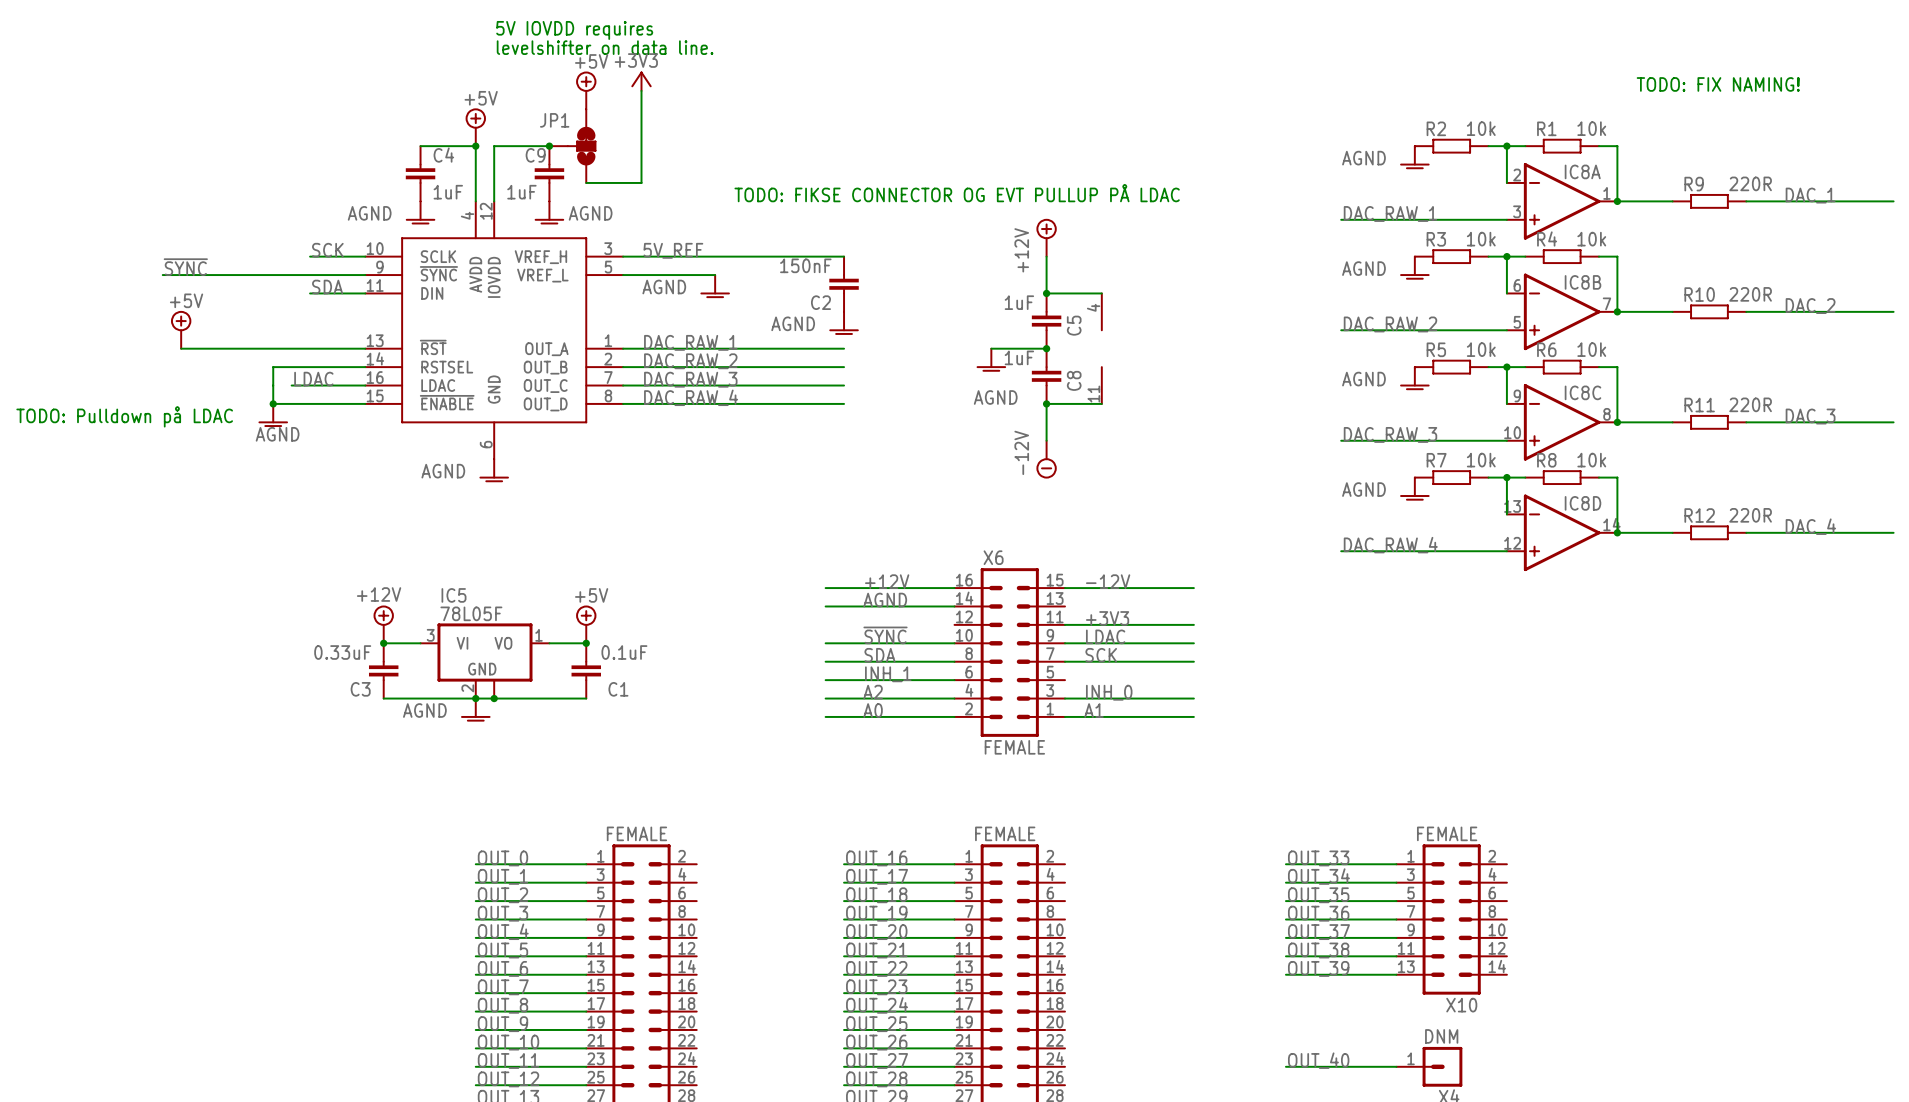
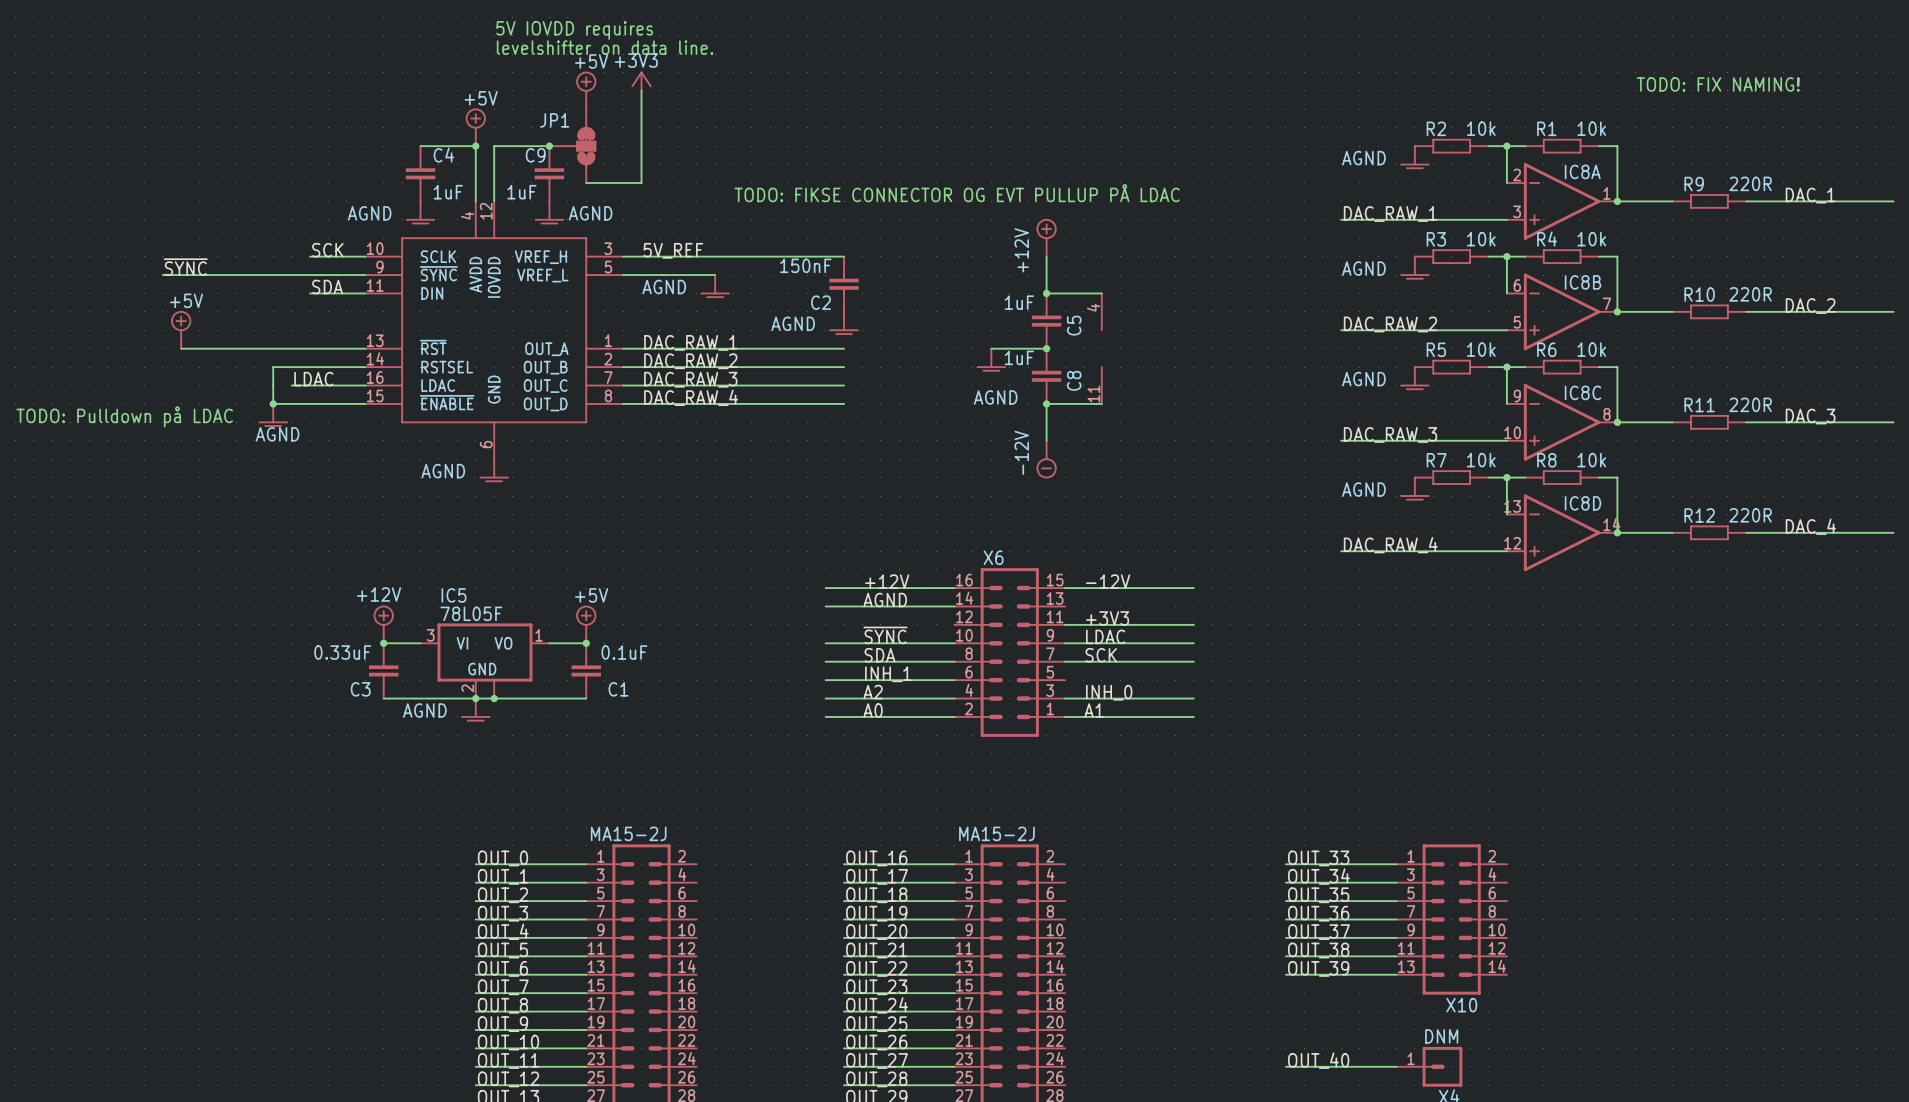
X6 value: FEMALE (1014, 747) -> none
part value: FEMALE (636, 833) -> MA15-2J (628, 833)
part value: FEMALE (1005, 833) -> MA15-2J (996, 833)
X10 value: FEMALE (1447, 833) -> none

